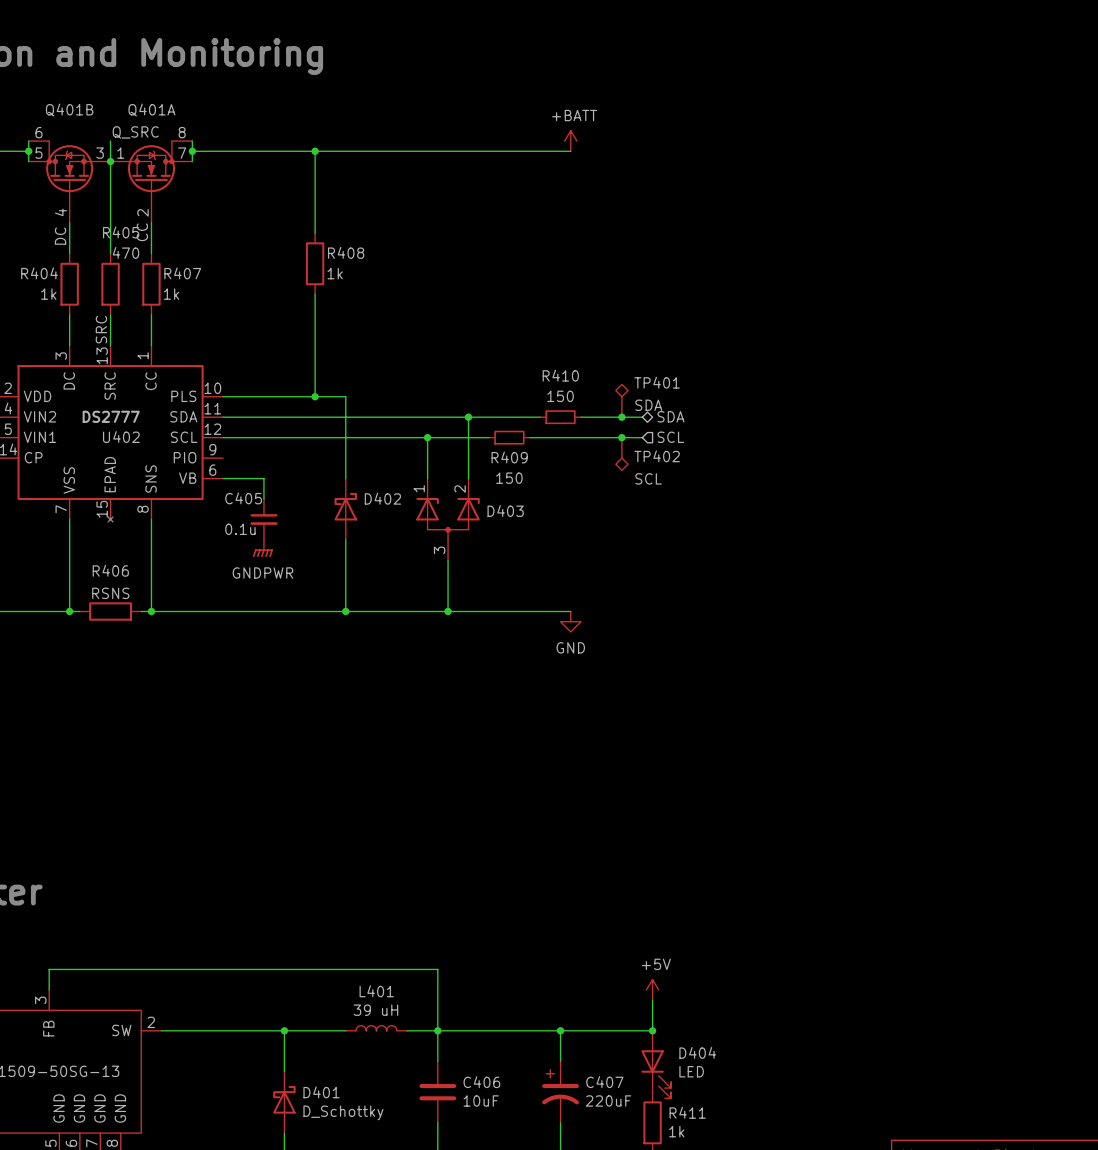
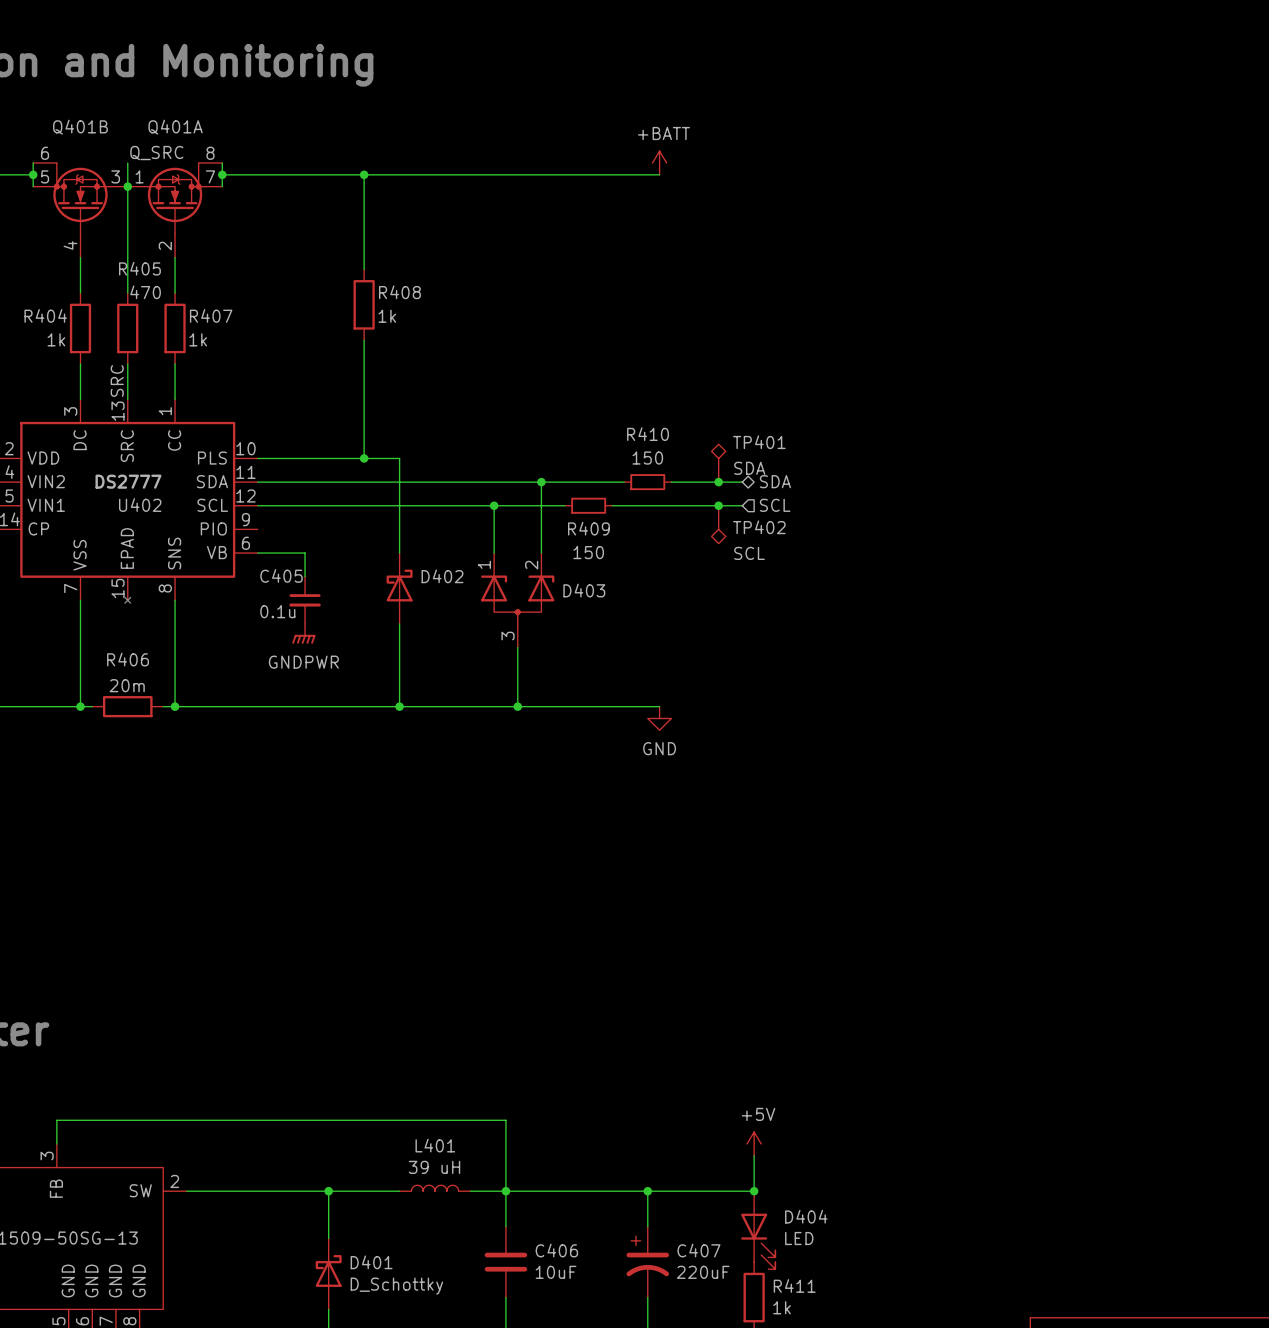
label: CC (142, 232) -> none
label: DC (60, 236) -> none
R406 value: RSNS (110, 593) -> 20m (127, 685)

